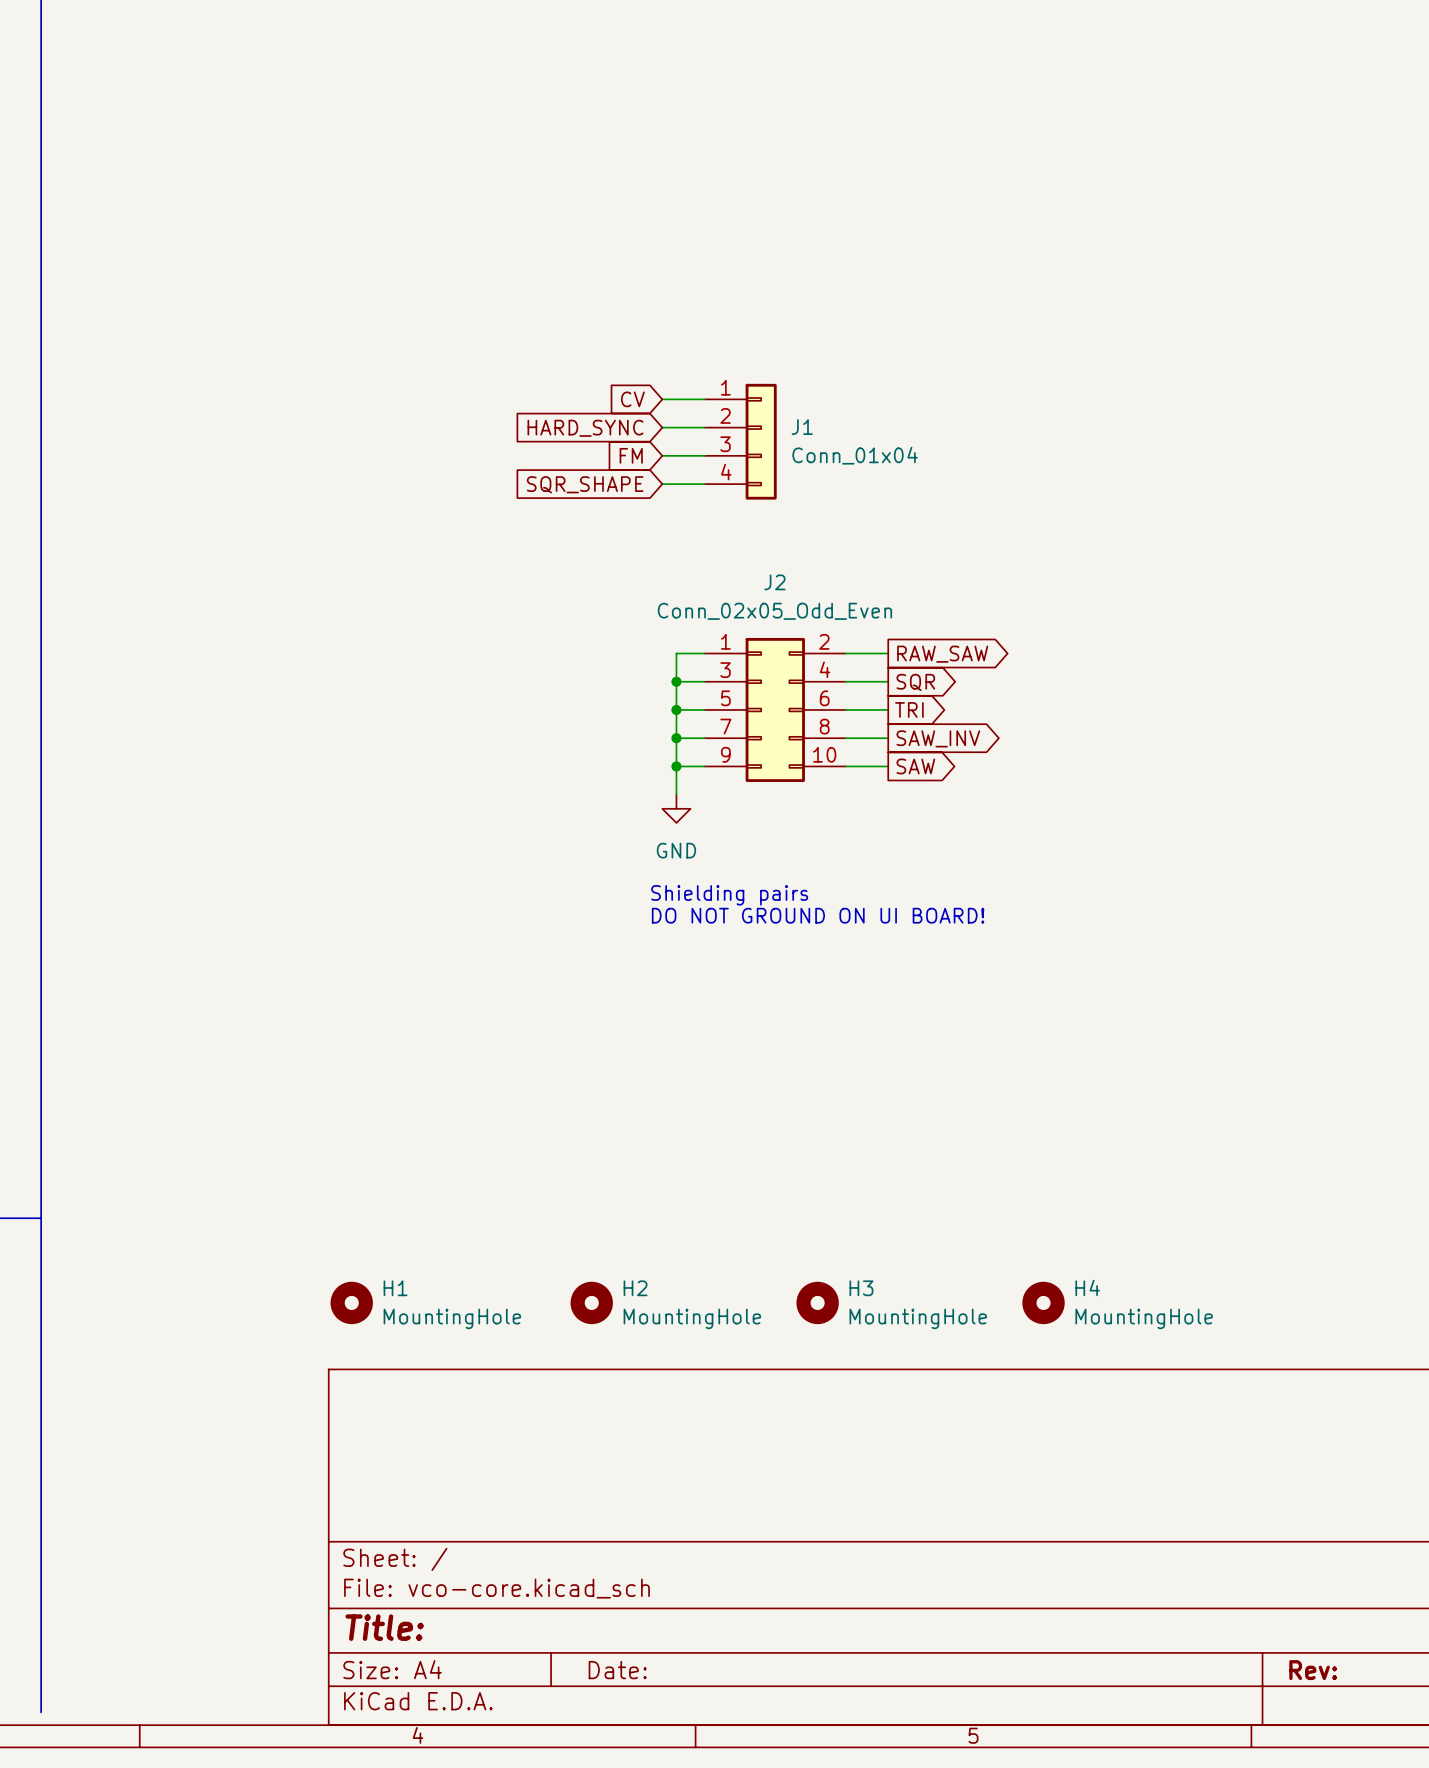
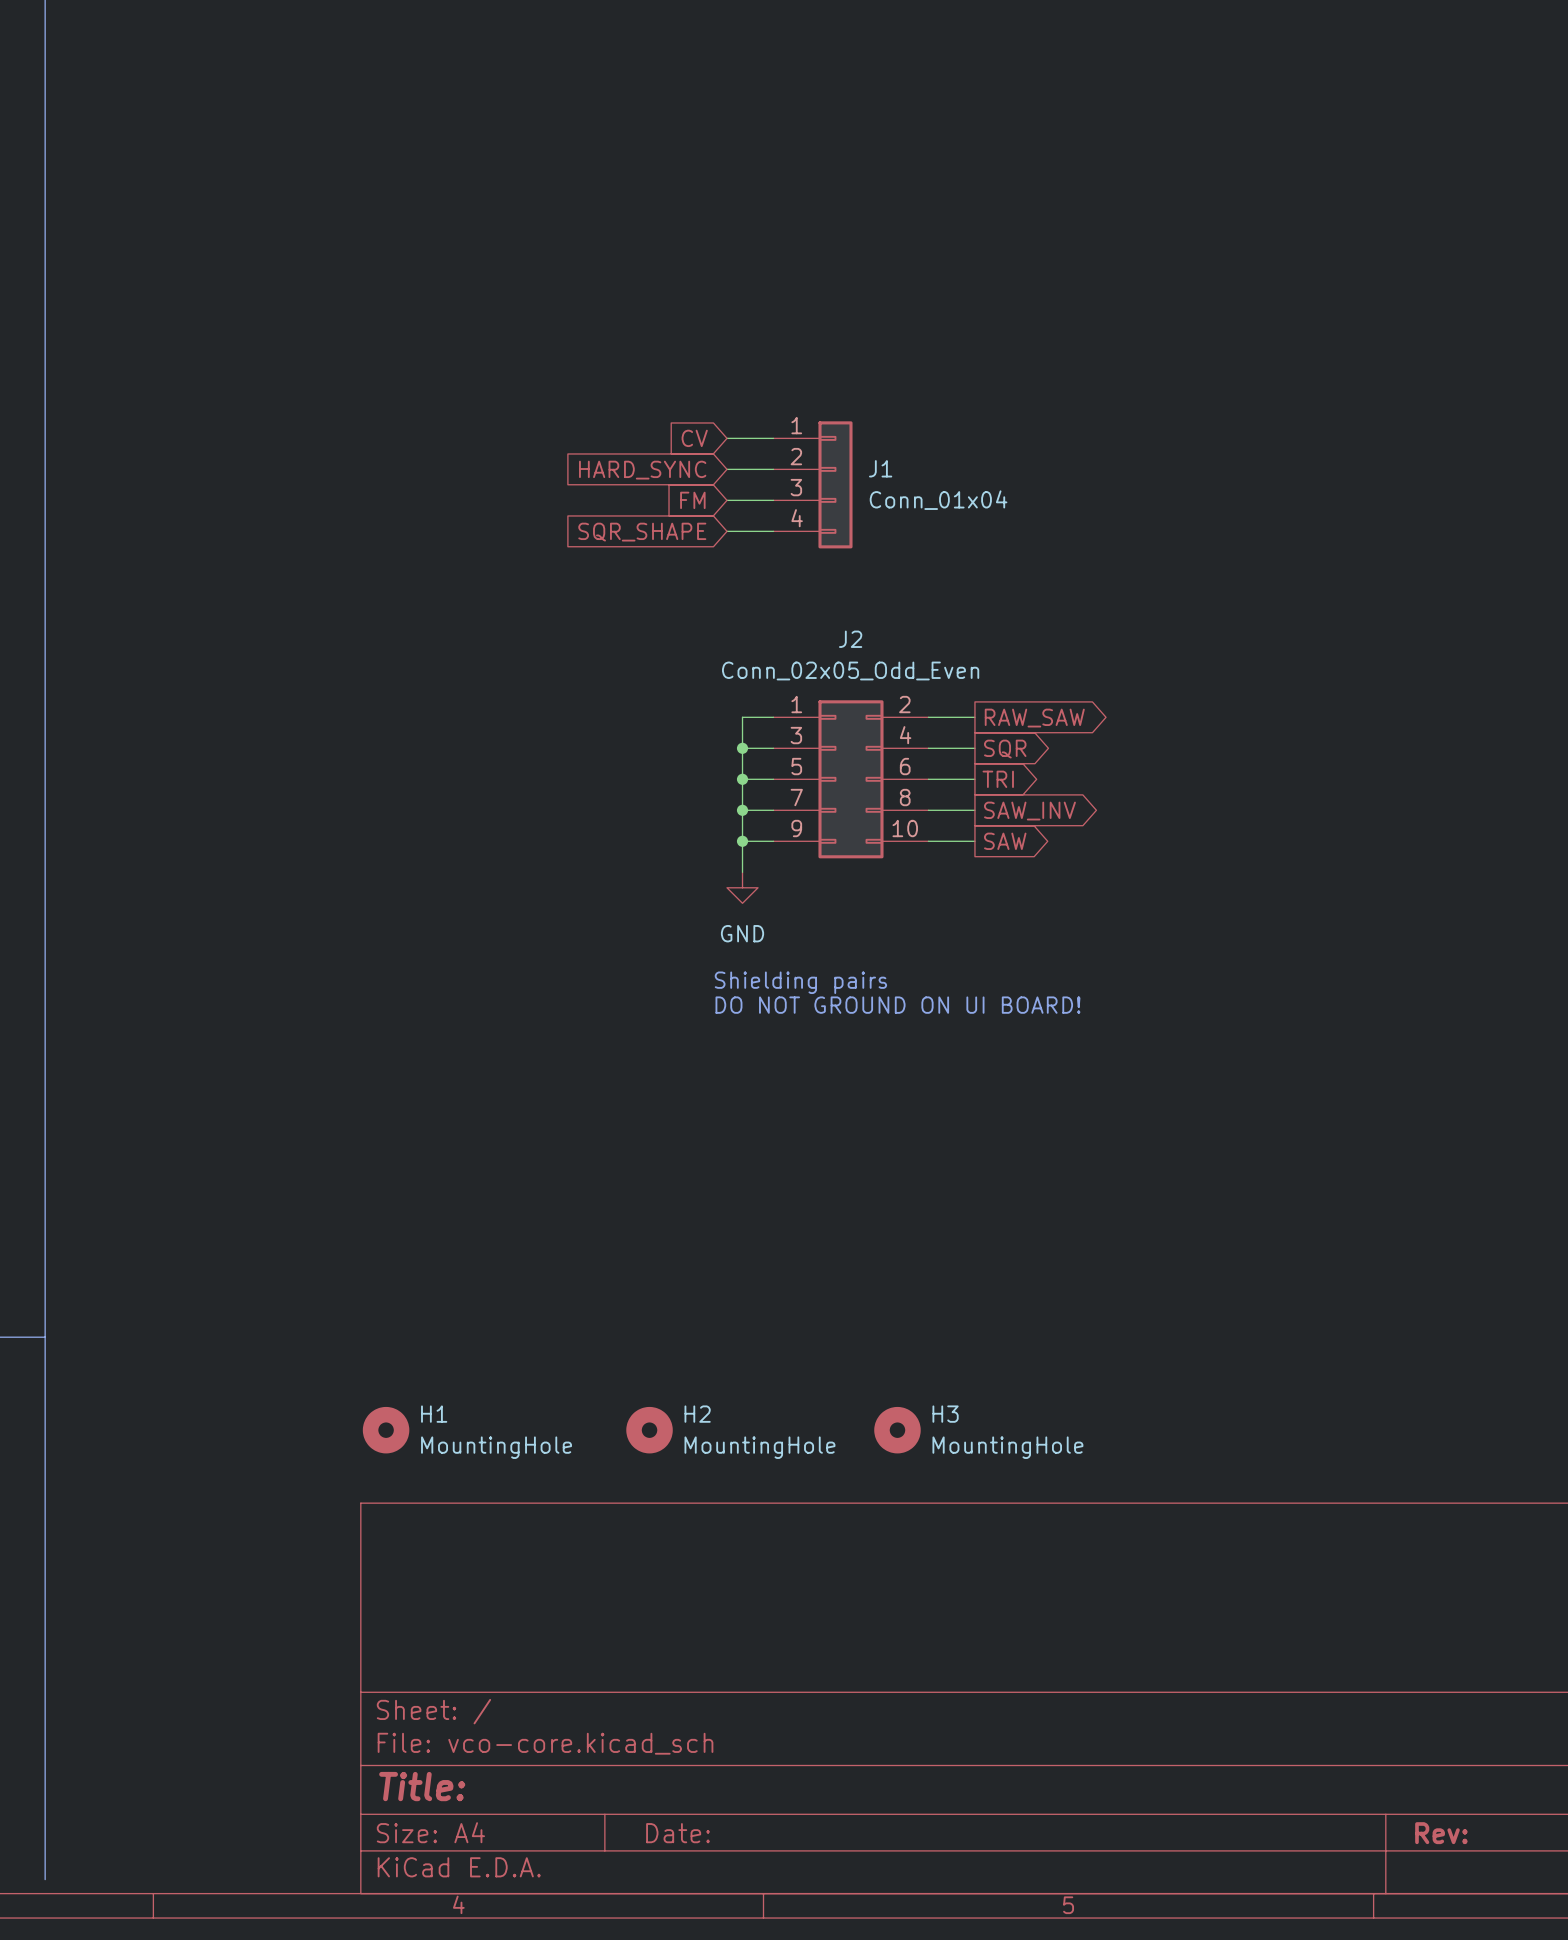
H4: MountingHole (1043, 1302) -> none

